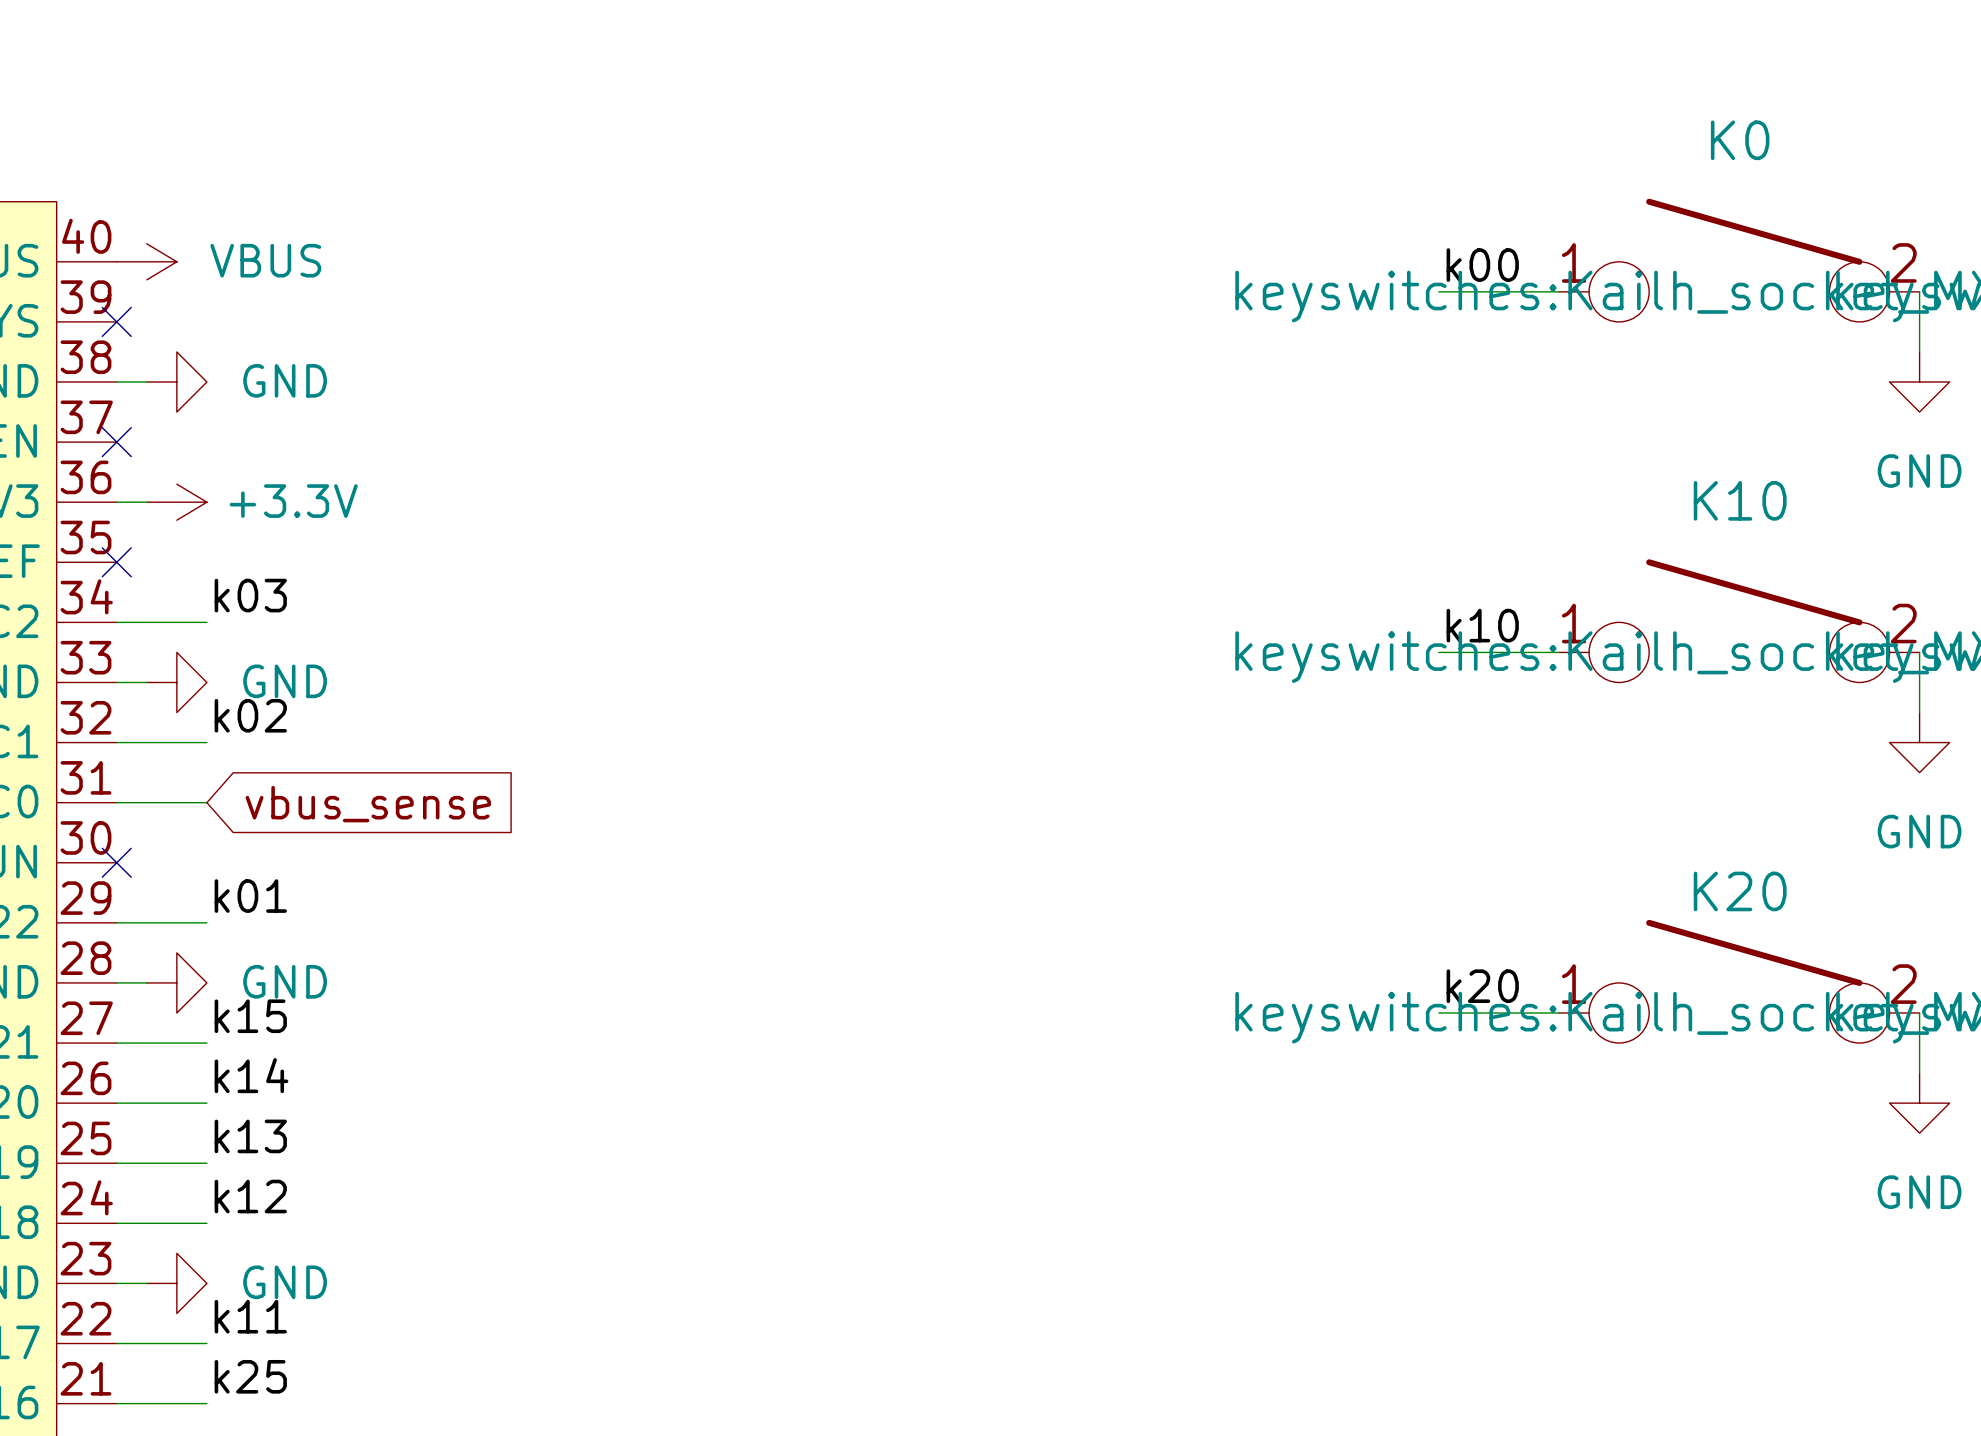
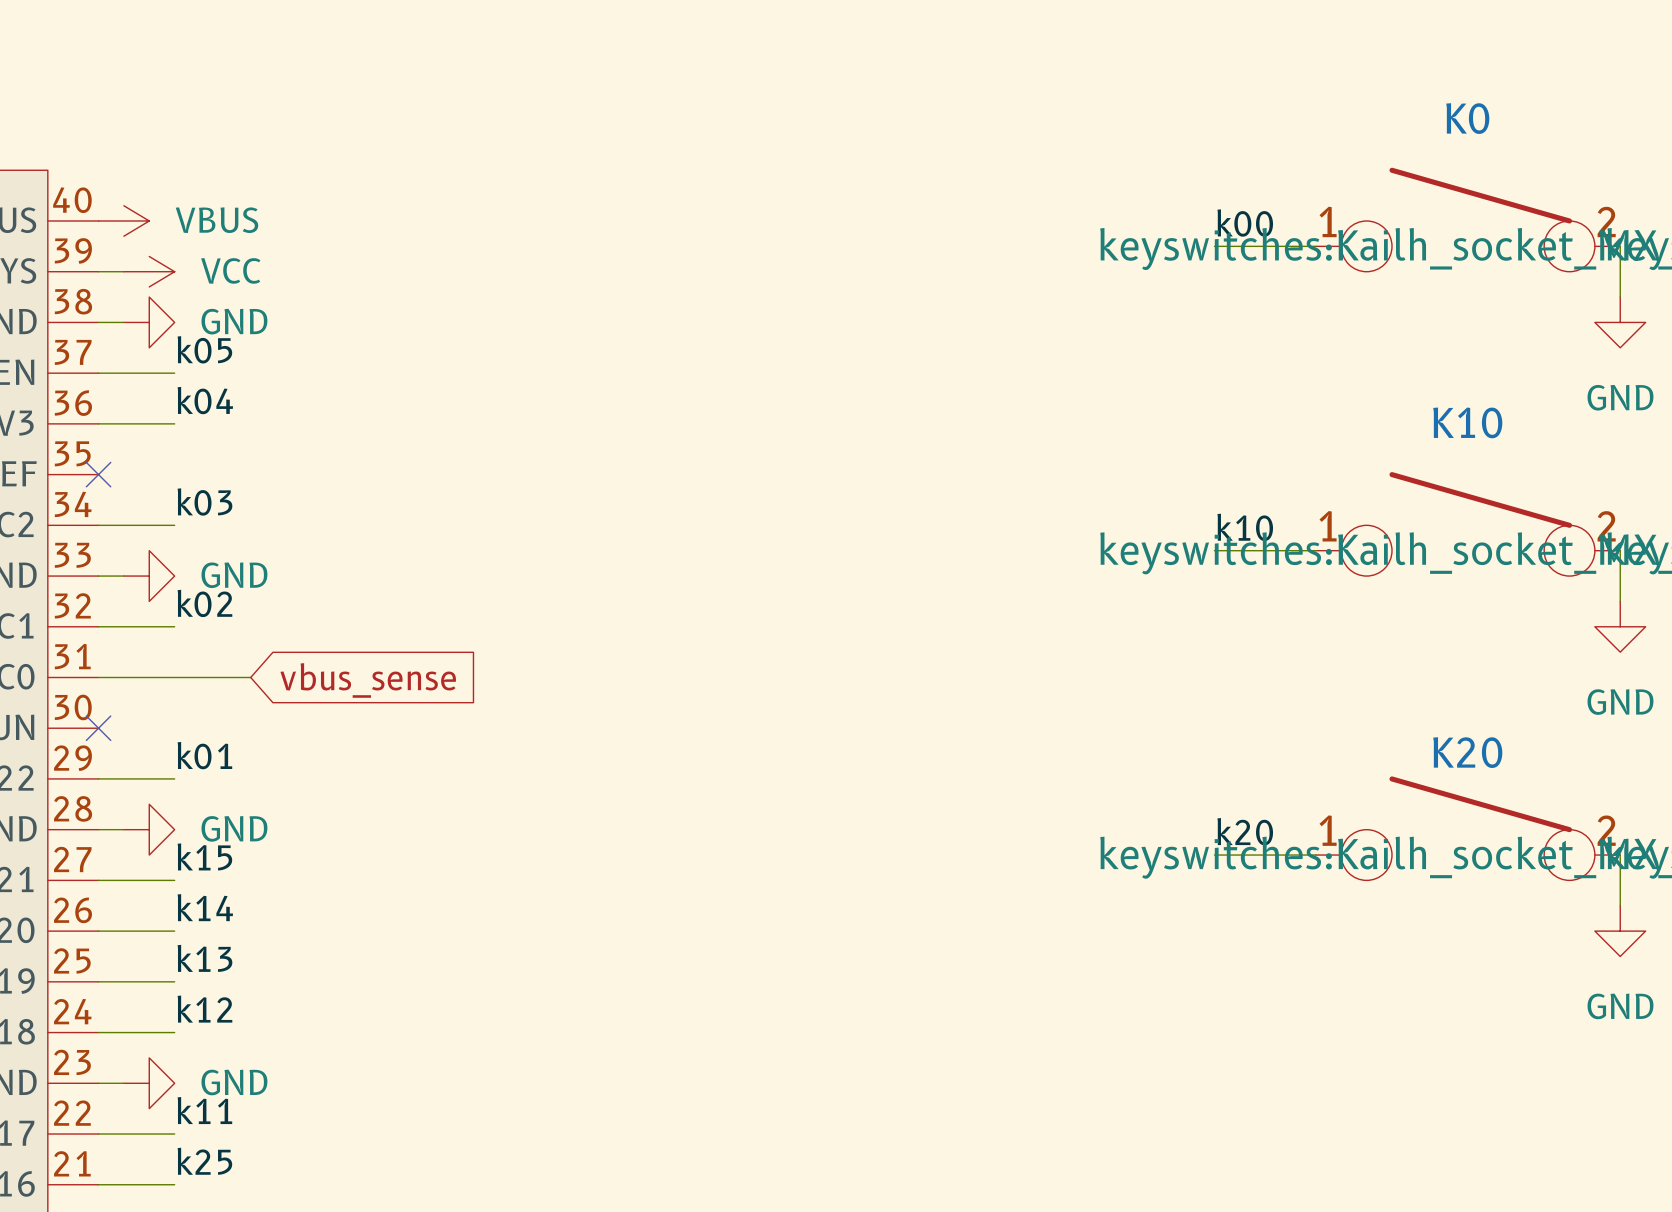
wire: none -> (98, 271) (123, 271)
no-connect mark: (116, 321) -> none
power symbol: none -> VCC (149, 271)
label: none -> k05 (204, 349)
wire: none -> (98, 373) (174, 373)
no-connect mark: (116, 442) -> none
label: none -> k04 (205, 400)
power symbol: +3.3V (176, 502) -> none
wire: none -> (174, 677) (250, 677)
global label position: vbus_sense (368, 804) -> vbus_sense (368, 680)

